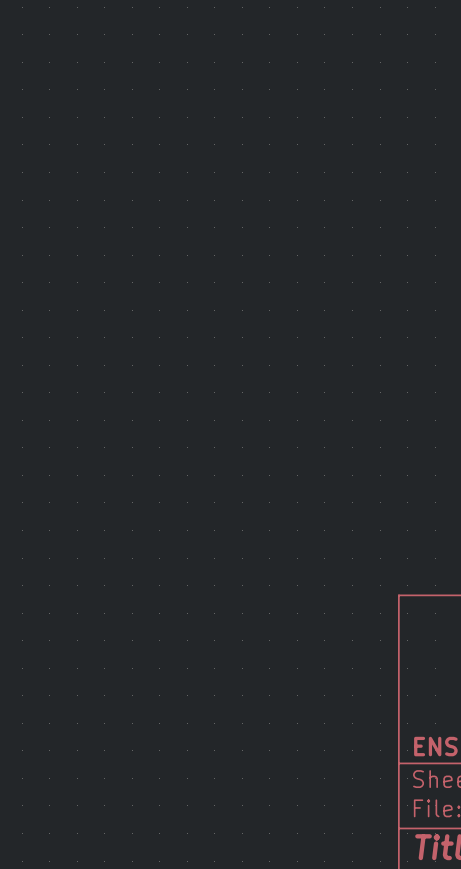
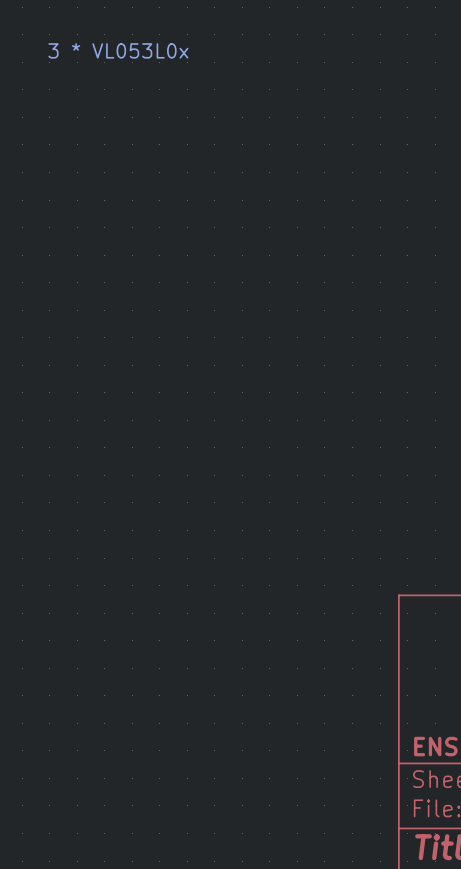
text: none -> 3 * VL053L0x (118, 50)

